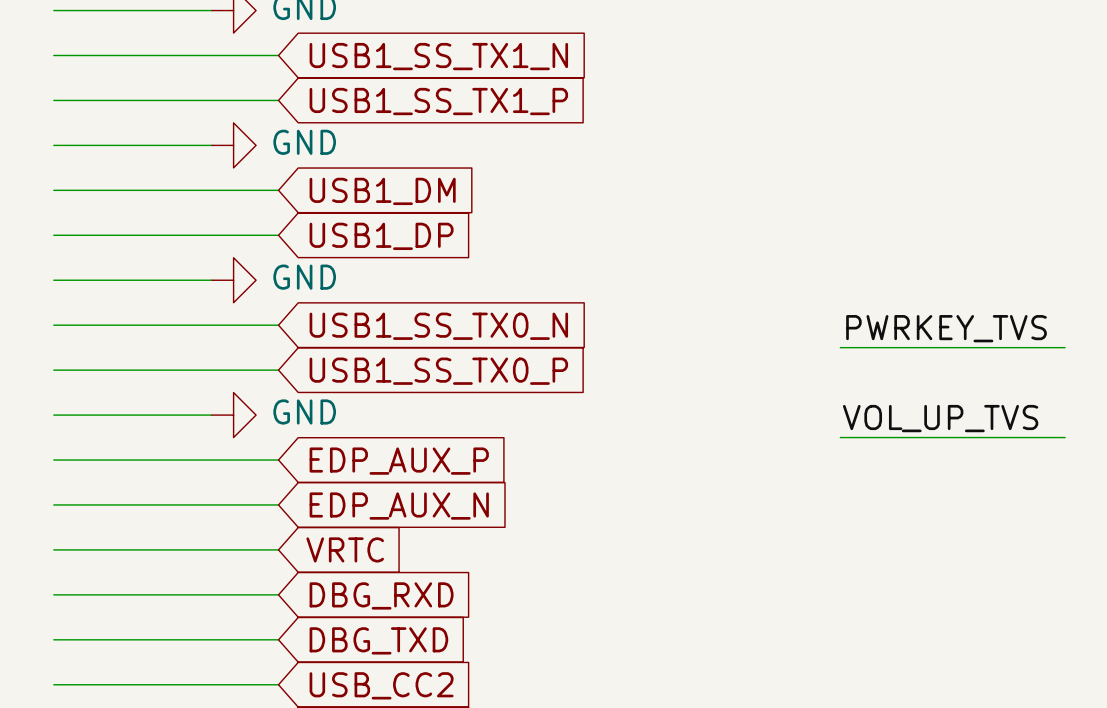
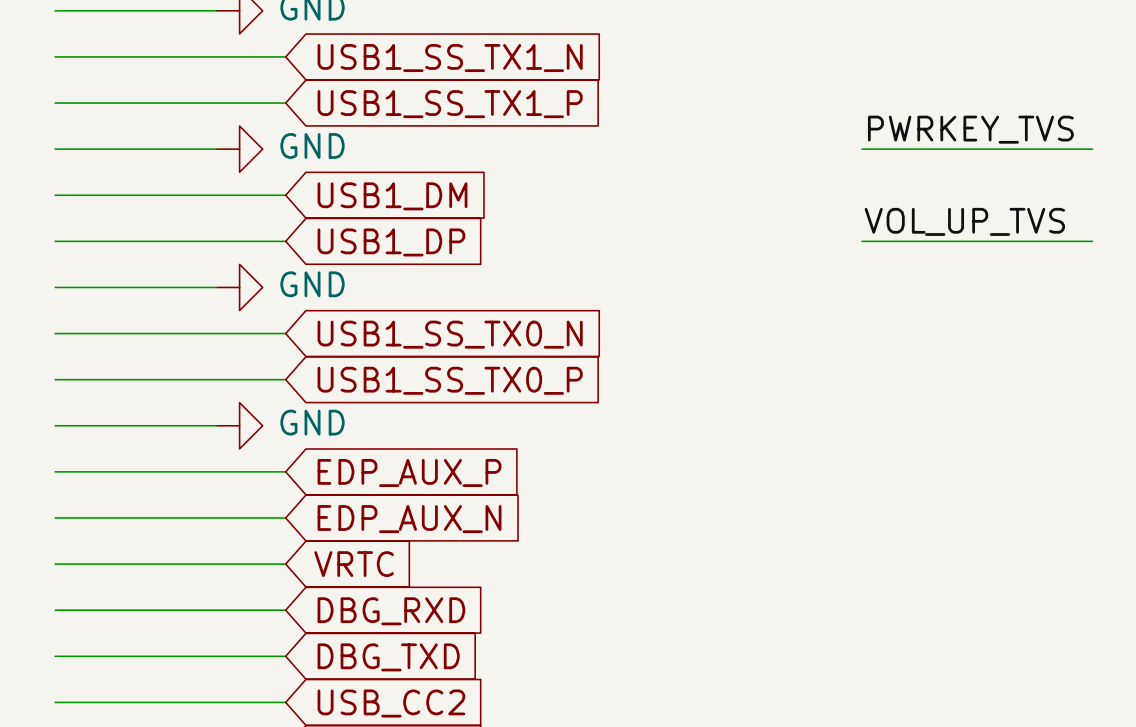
label position: PWRKEY_TVS (946, 328) -> PWRKEY_TVS (970, 129)
wire: (840, 347) (1065, 347) -> (862, 149) (1092, 149)
label position: VOL_UP_TVS (940, 418) -> VOL_UP_TVS (964, 221)
wire: (840, 437) (1065, 437) -> (862, 241) (1092, 241)

